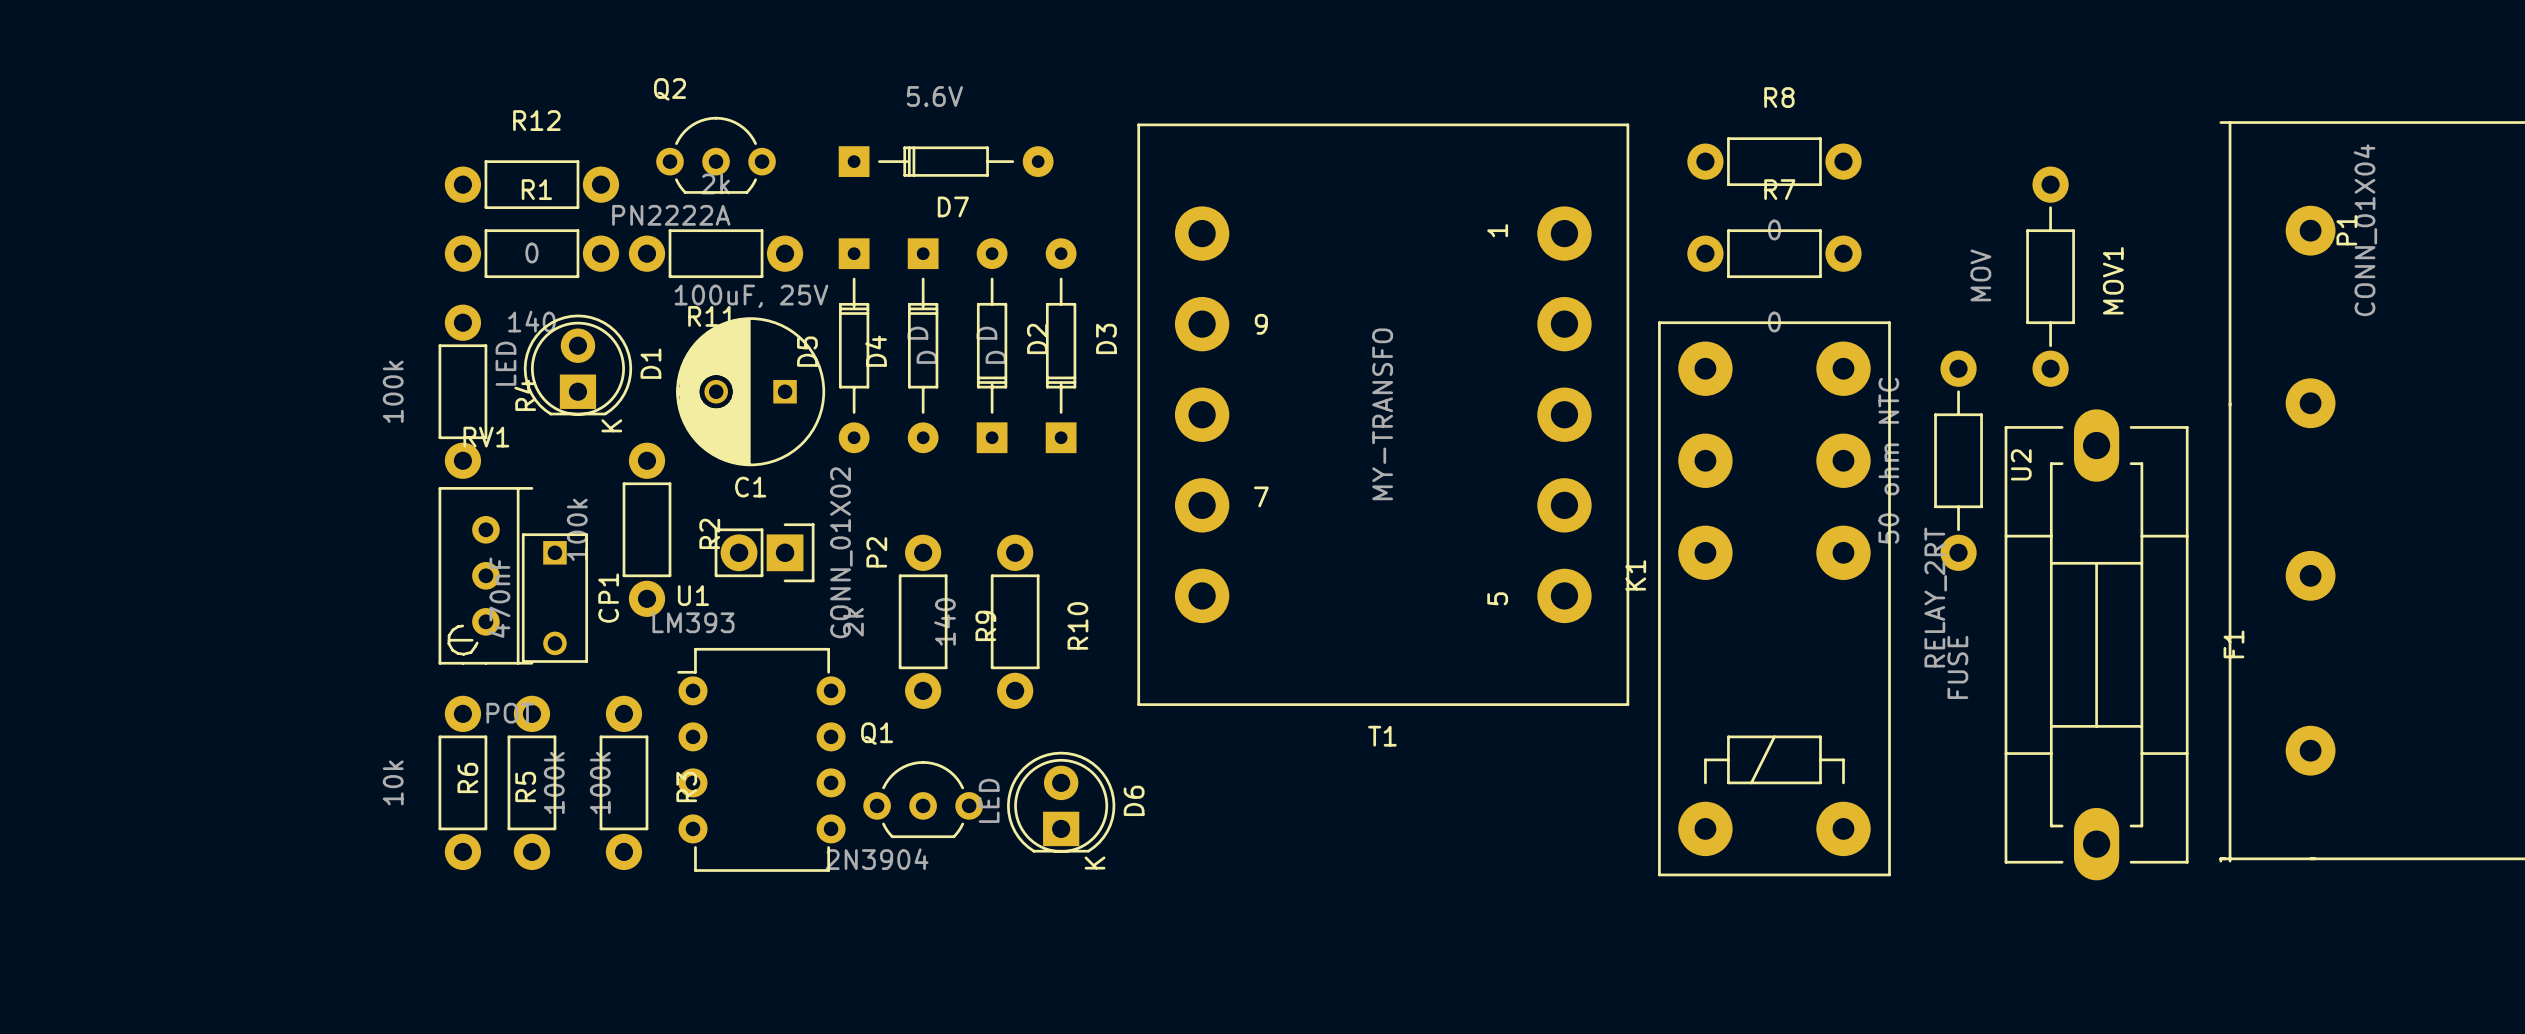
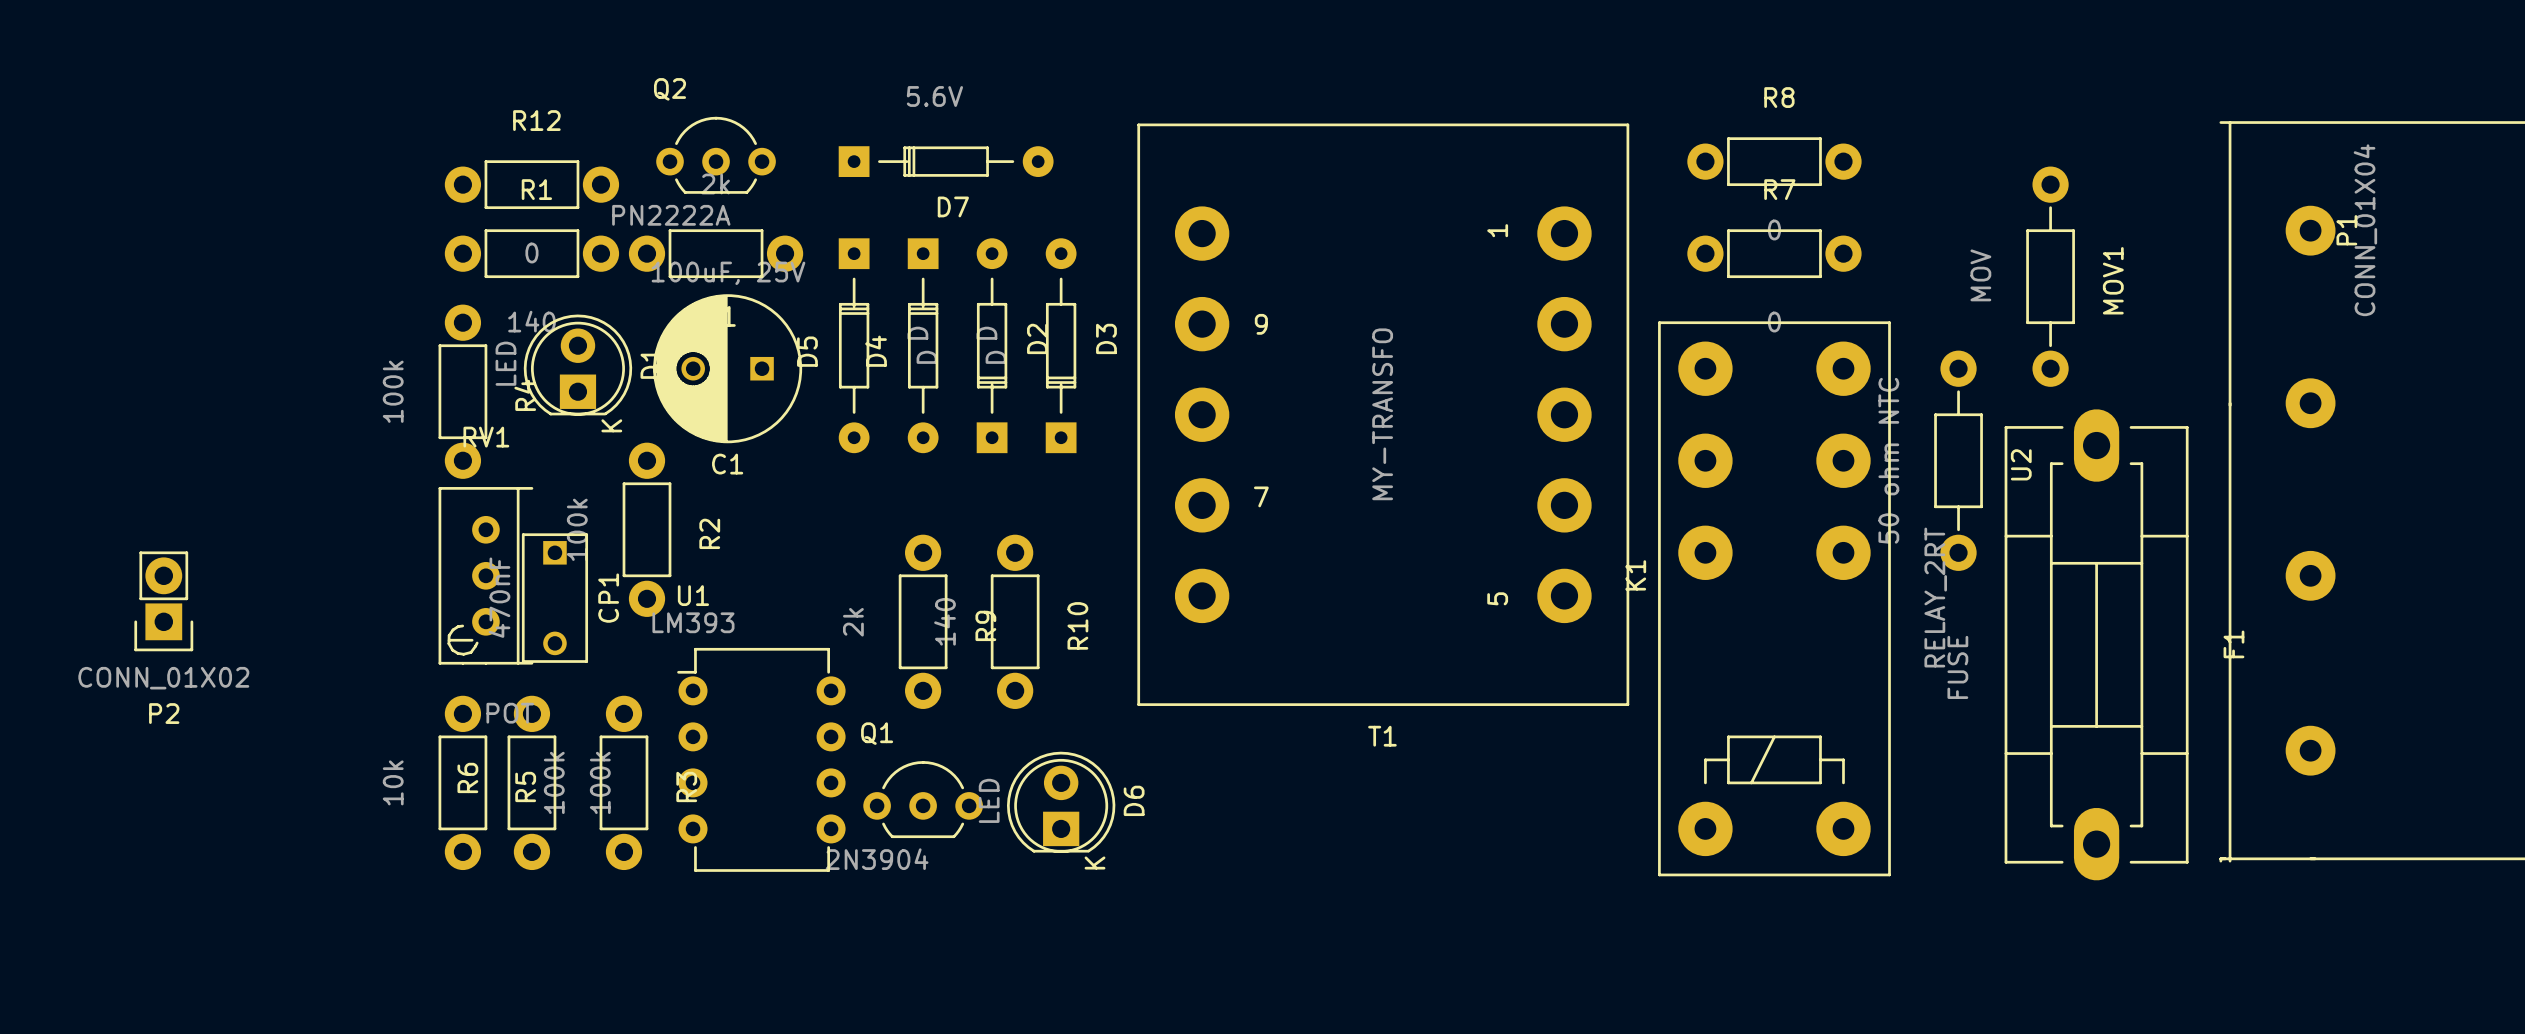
C1 position: (750, 391) -> (727, 368)
P2 rotation: 0° (764, 552) -> 90° clockwise (163, 601)
P2 position: (764, 552) -> (163, 601)

